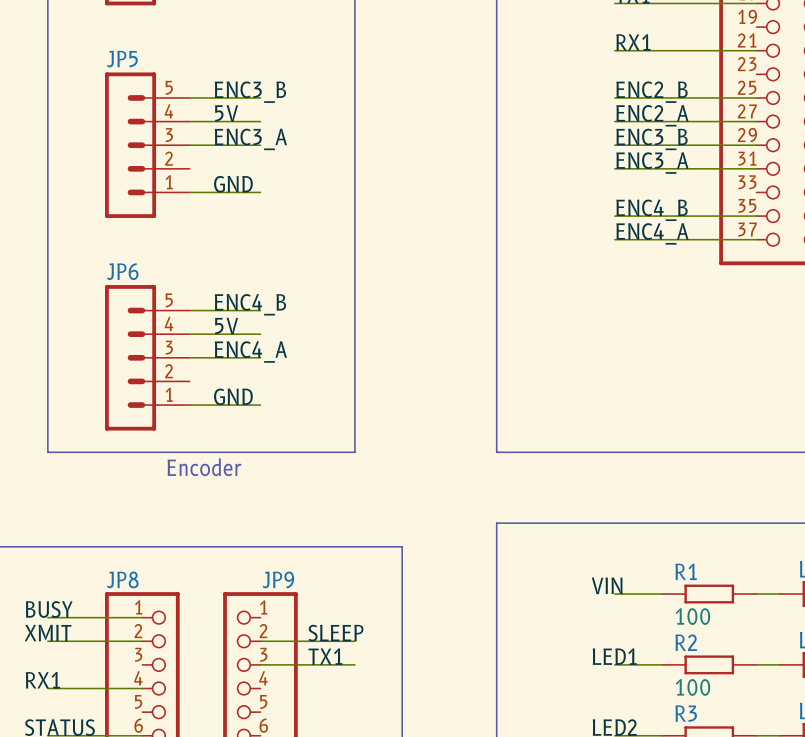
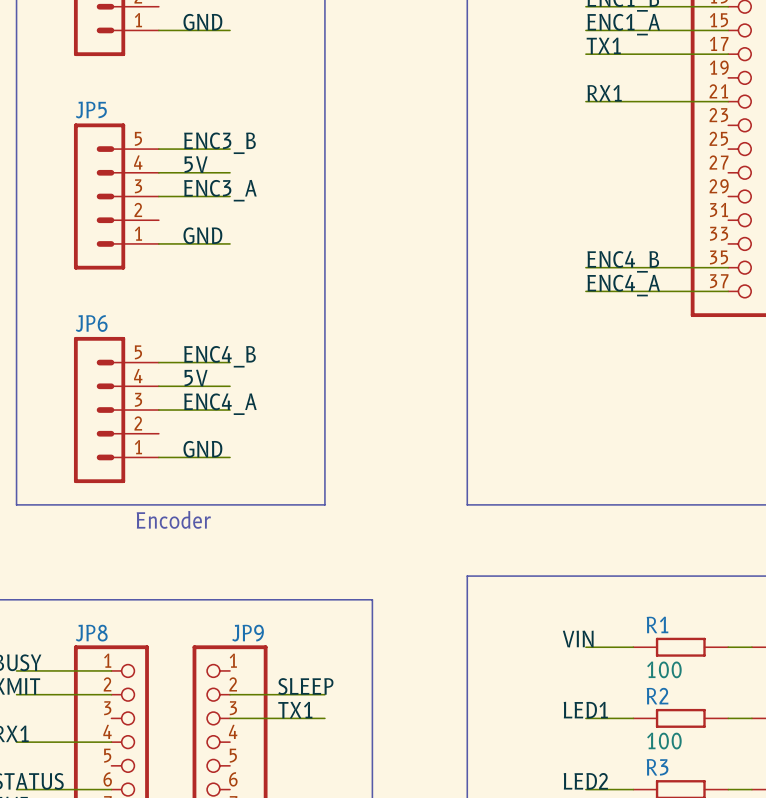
label: ENC2_B (652, 92) -> none
wire: (614, 97) (756, 97) -> none
label: ENC2_A (652, 115) -> none
wire: (614, 121) (756, 121) -> none
label: ENC3_B (652, 139) -> none
wire: (614, 145) (756, 145) -> none
label: ENC3_A (652, 163) -> none
wire: (614, 168) (756, 168) -> none

